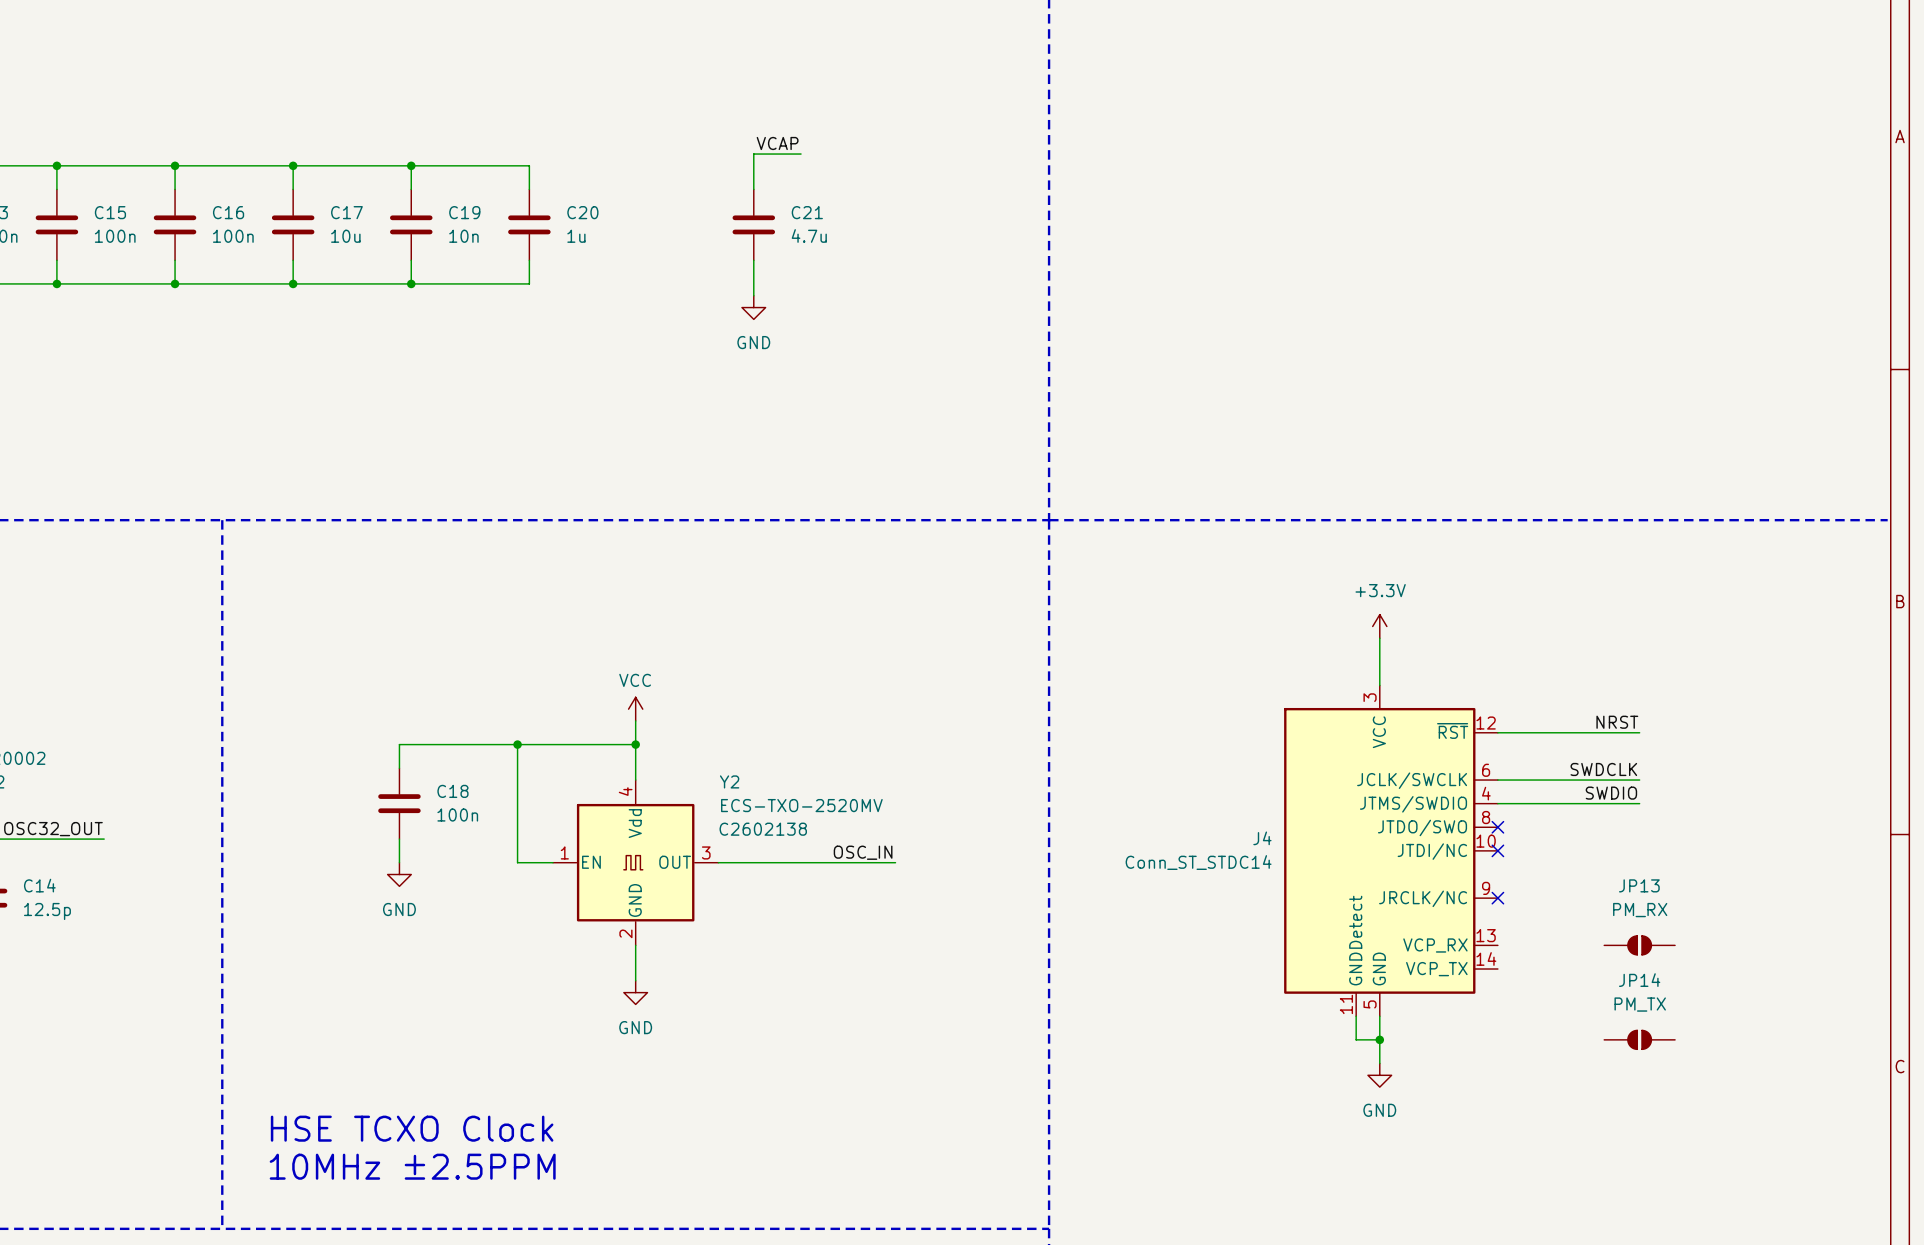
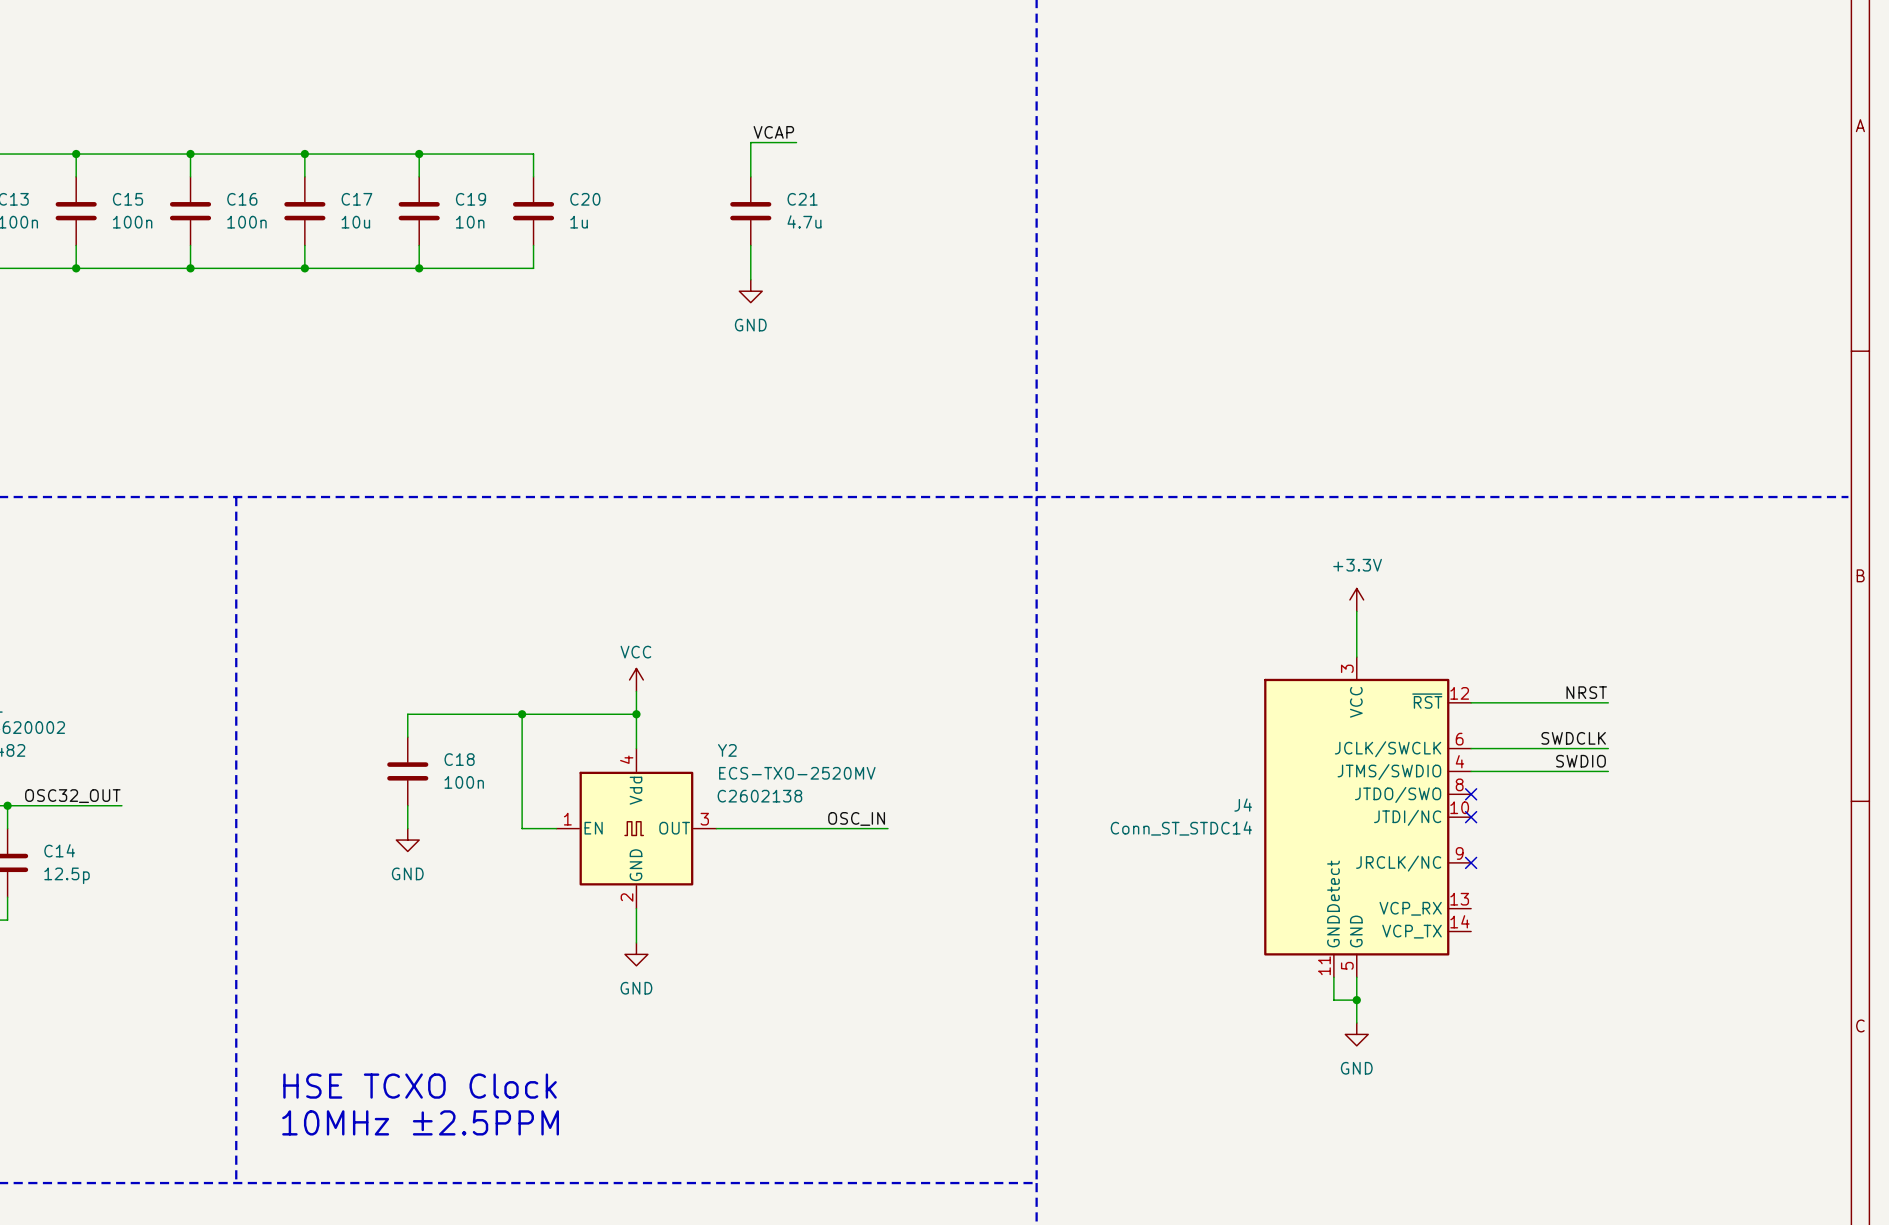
JP13: PM_RX (1639, 945) -> none
JP14: PM_TX (1639, 1039) -> none

